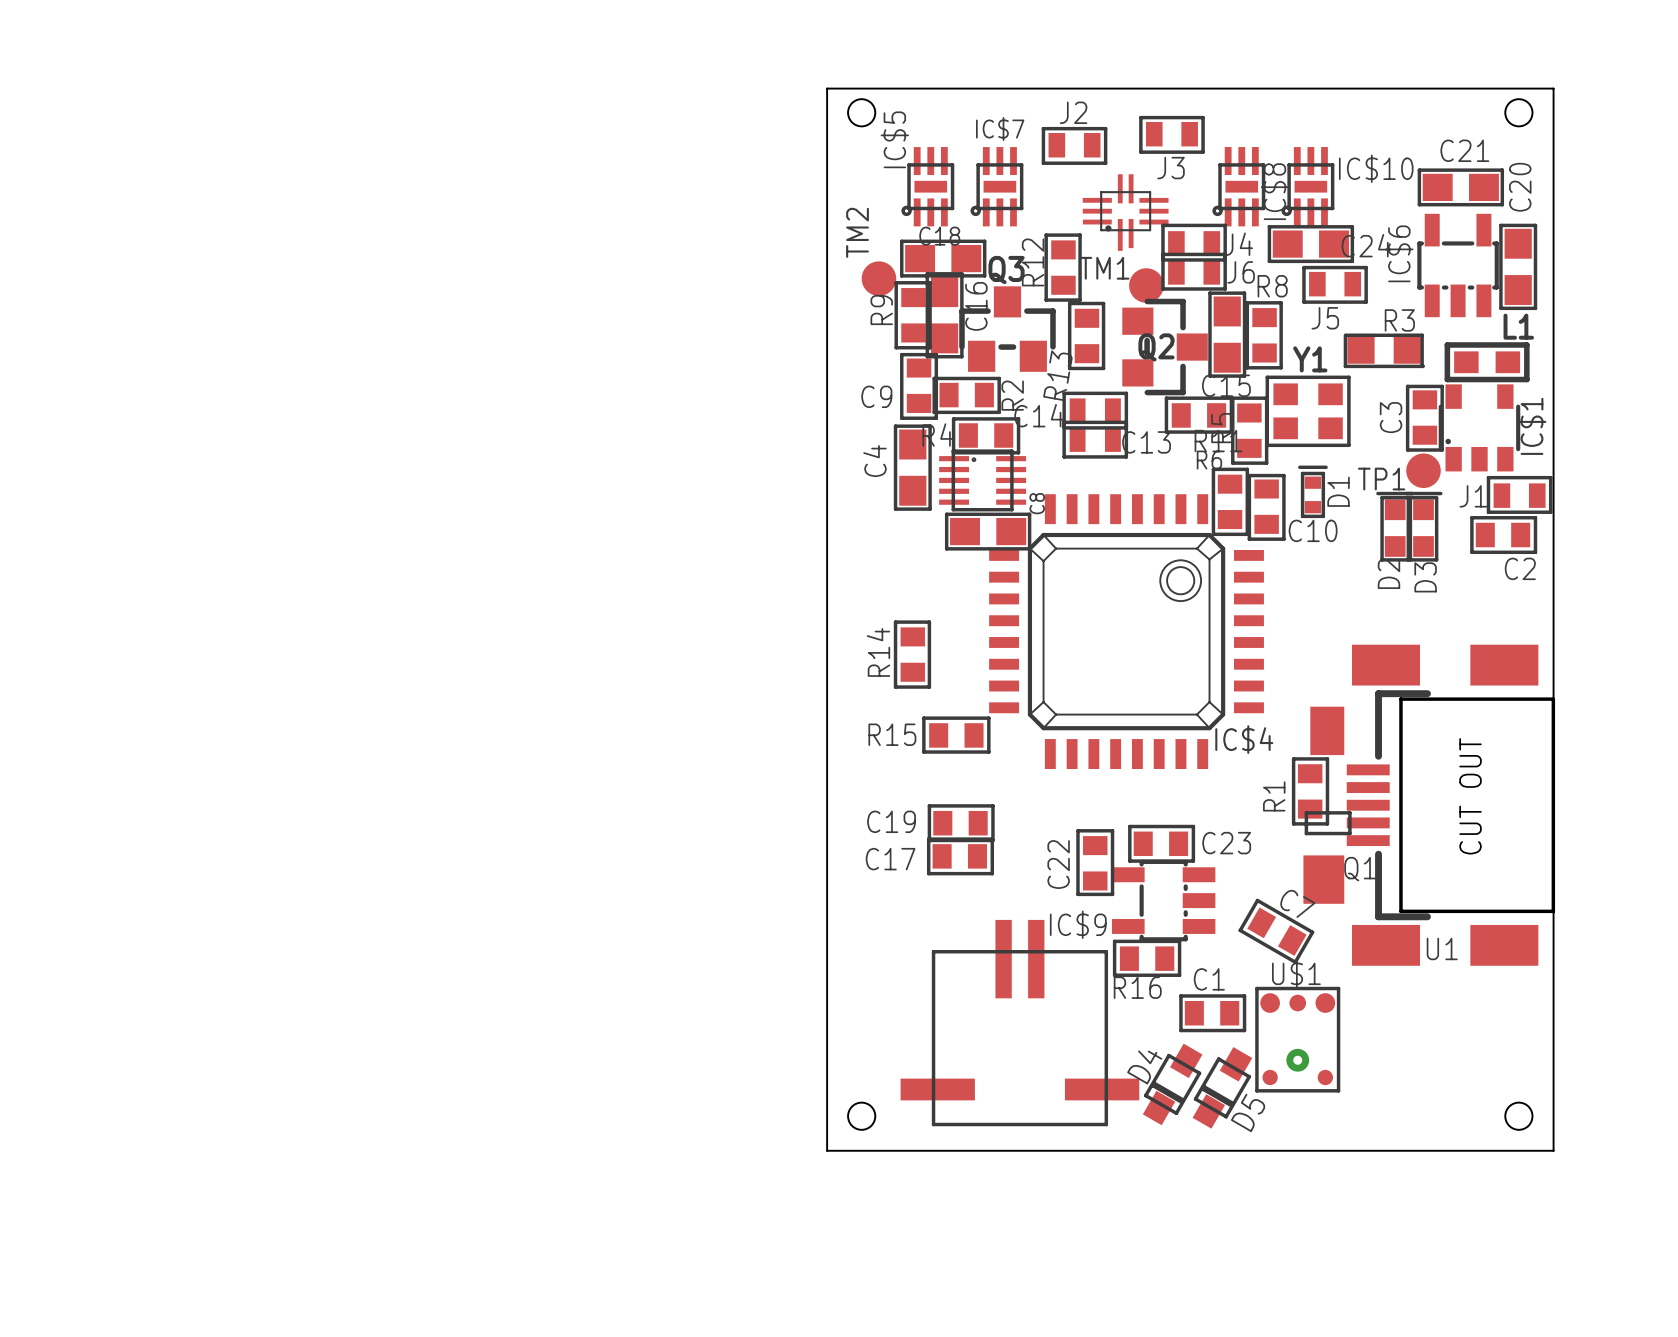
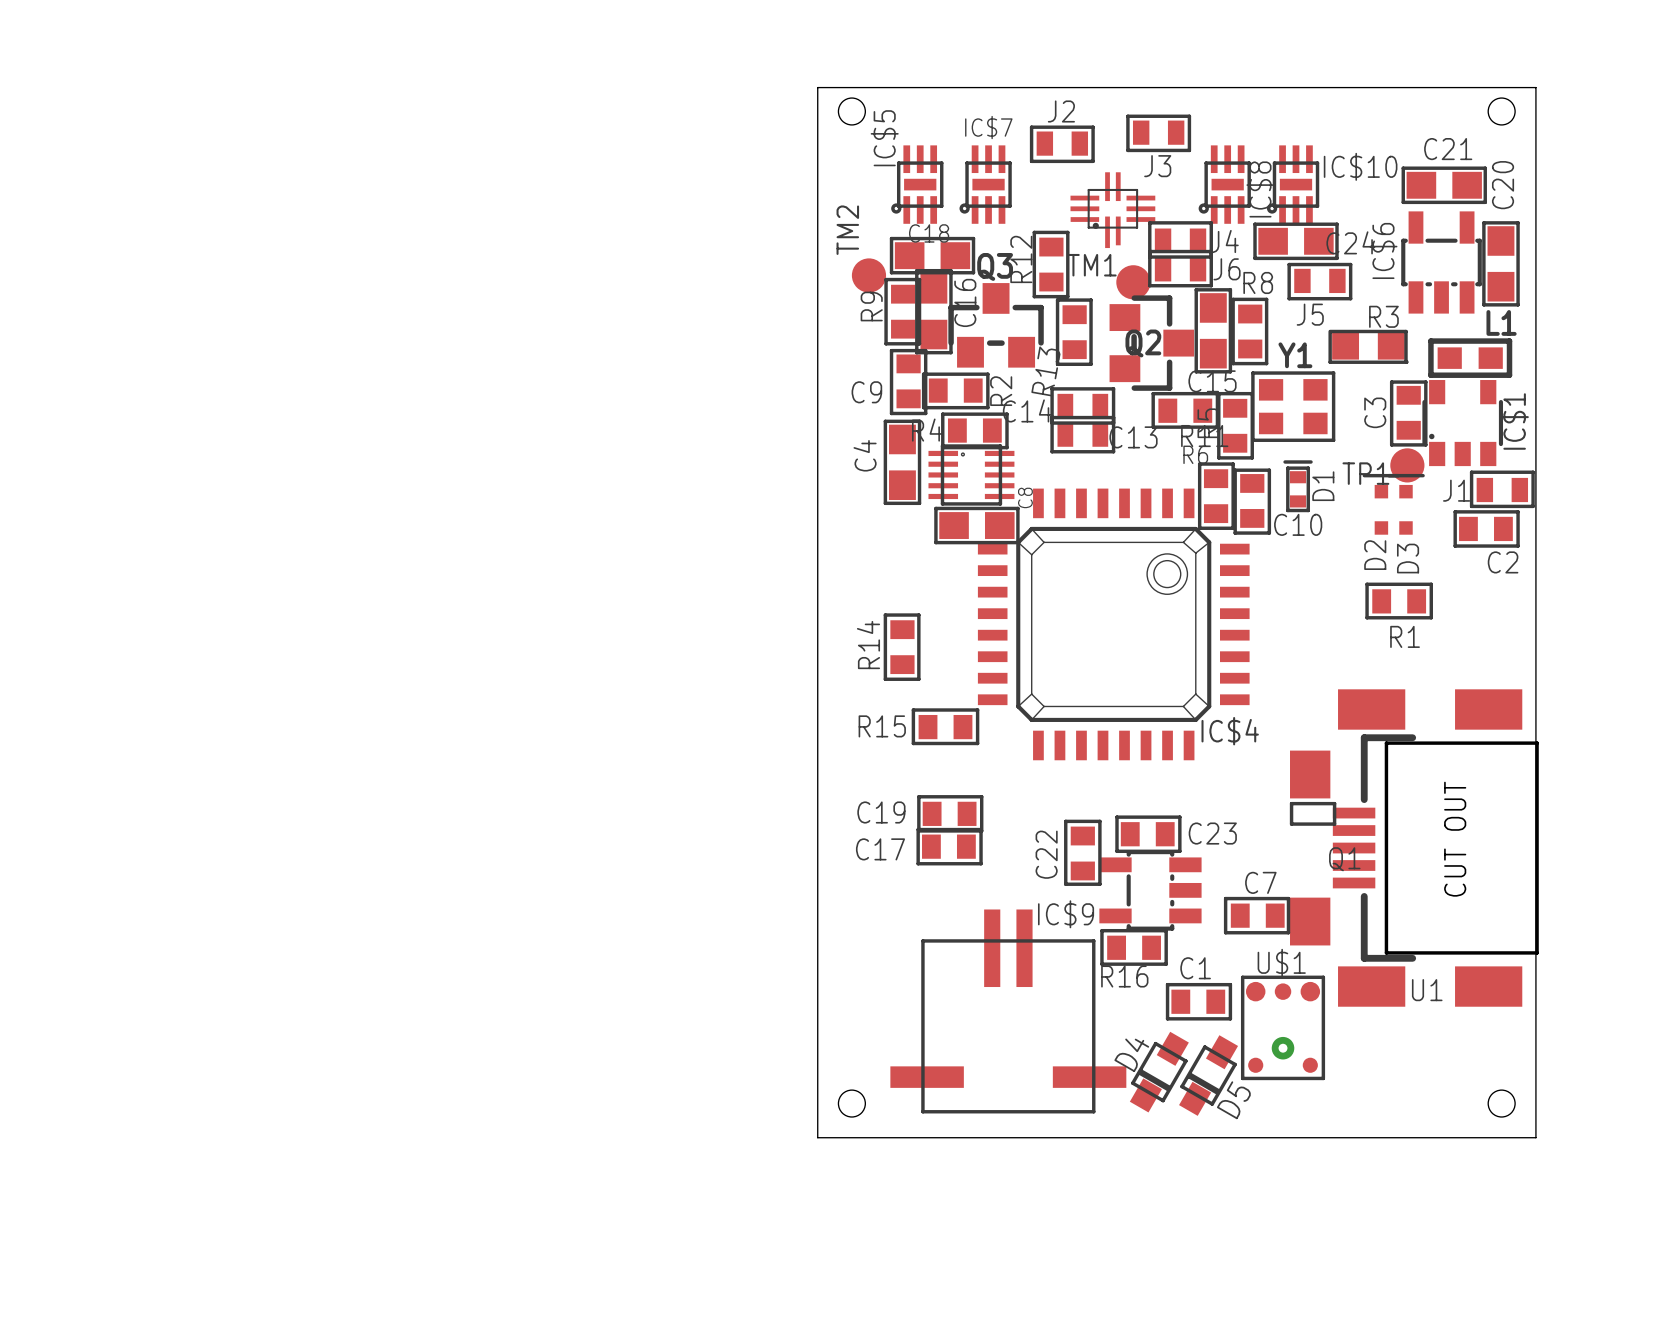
D2 footprint: [1376, 491, 1415, 562] -> [1362, 473, 1401, 535]
D3 footprint: [1404, 491, 1443, 562] -> [1387, 473, 1425, 535]
U1 footprint: [1303, 644, 1556, 966] -> [1290, 689, 1539, 1007]
R1 rotation: 0° (1310, 791) -> 90° clockwise (1399, 601)
R1 position: (1310, 791) -> (1399, 601)
C7 rotation: 0° (1276, 931) -> 30° counterclockwise (1257, 915)

